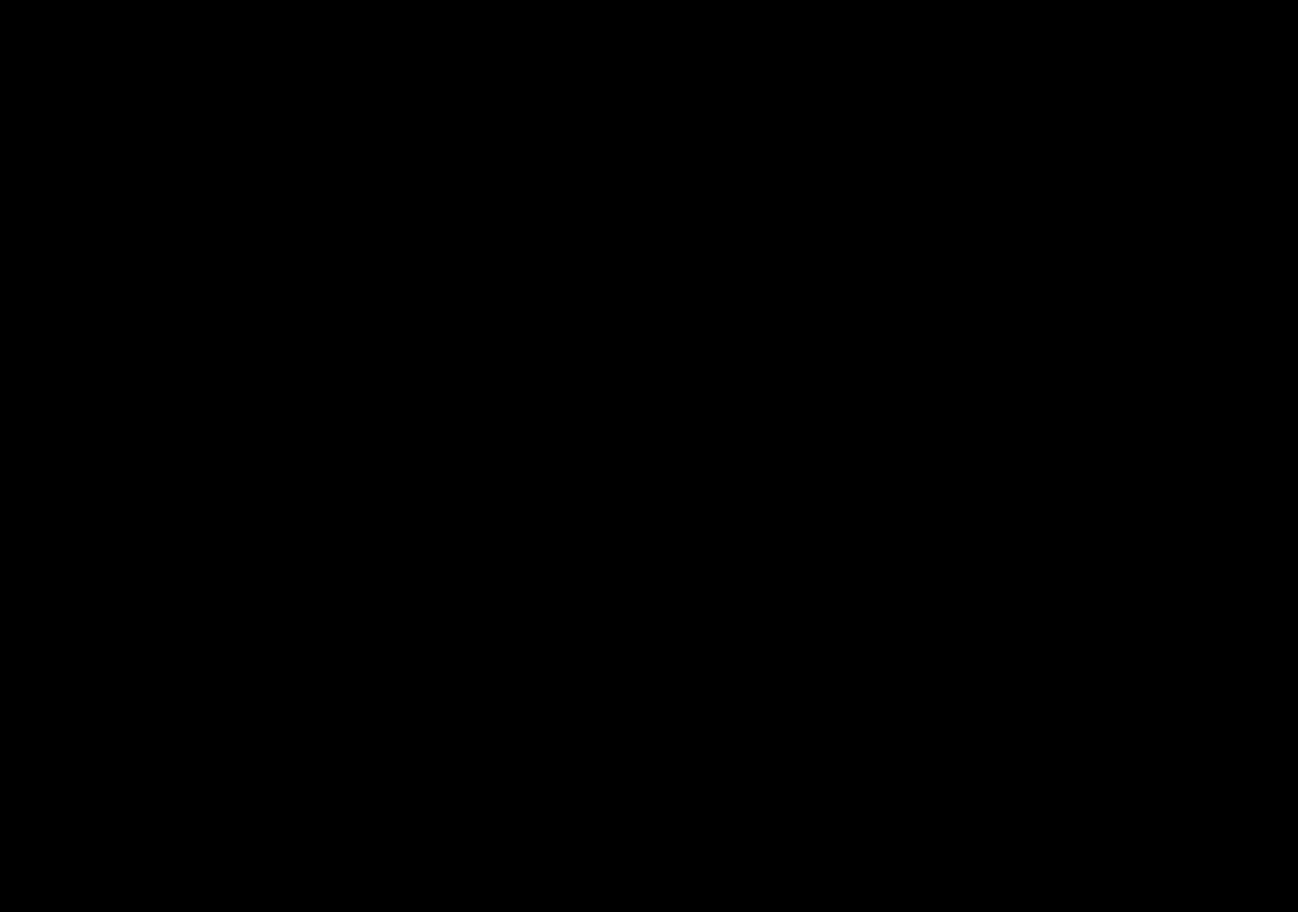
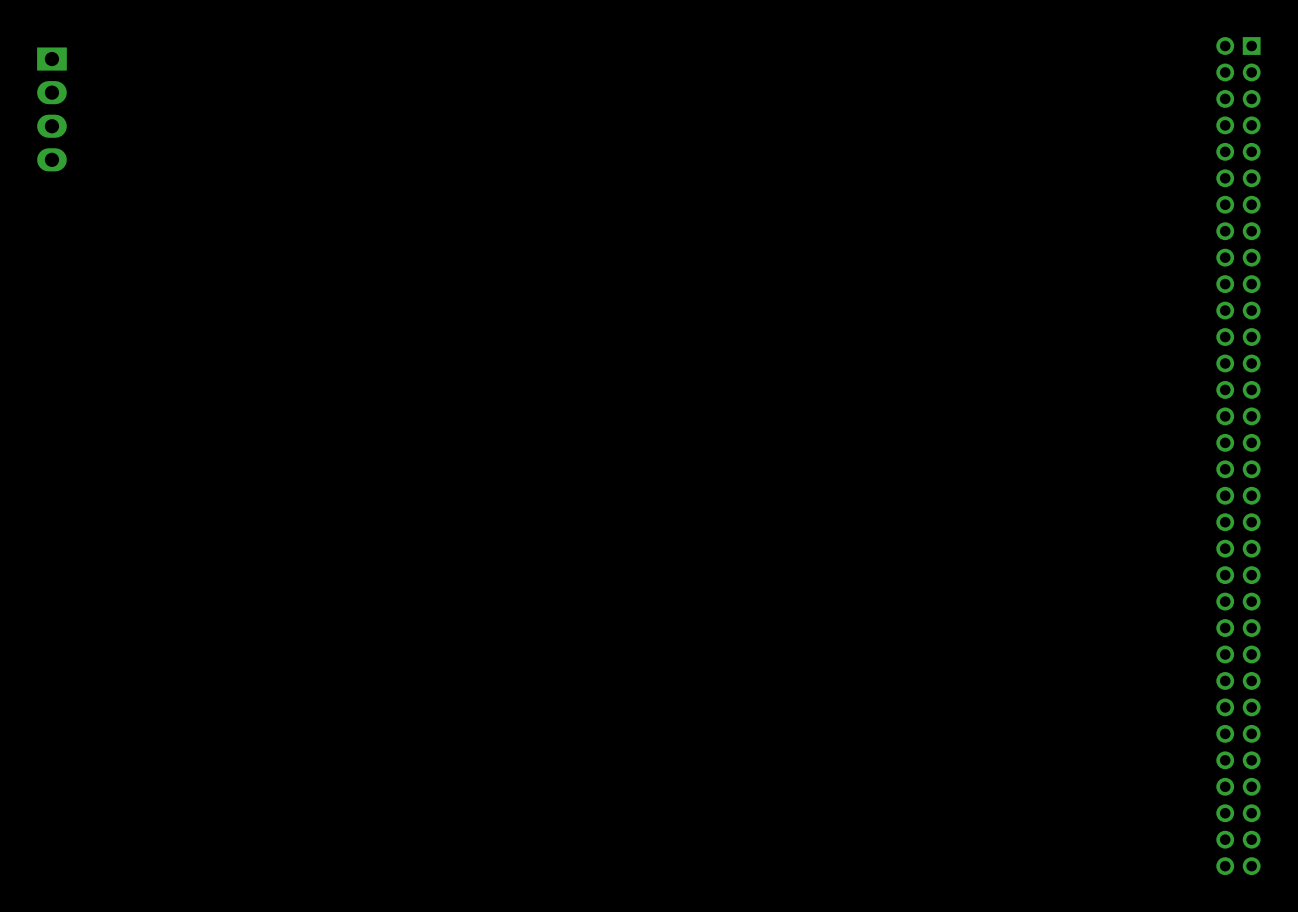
part: none -> (51, 109)
part: none -> (1238, 456)

